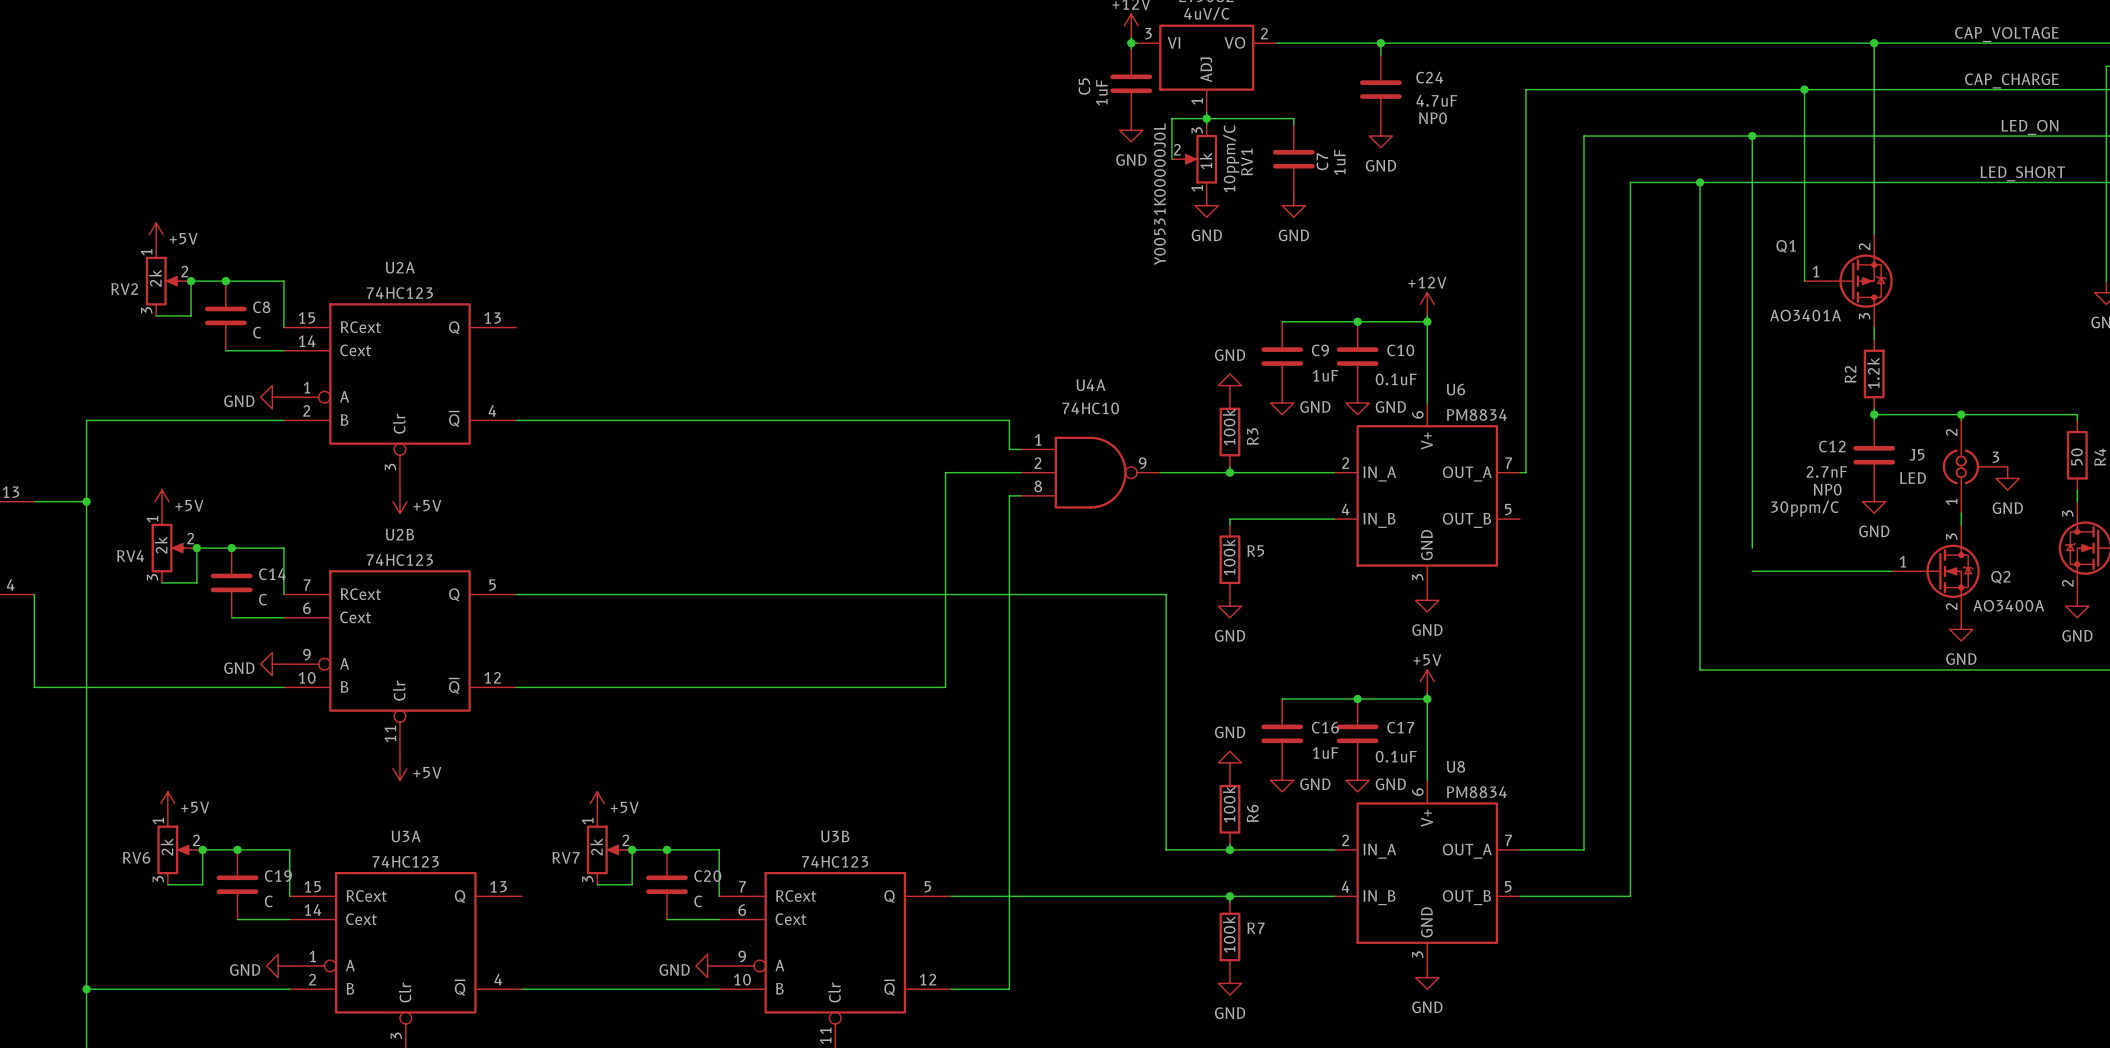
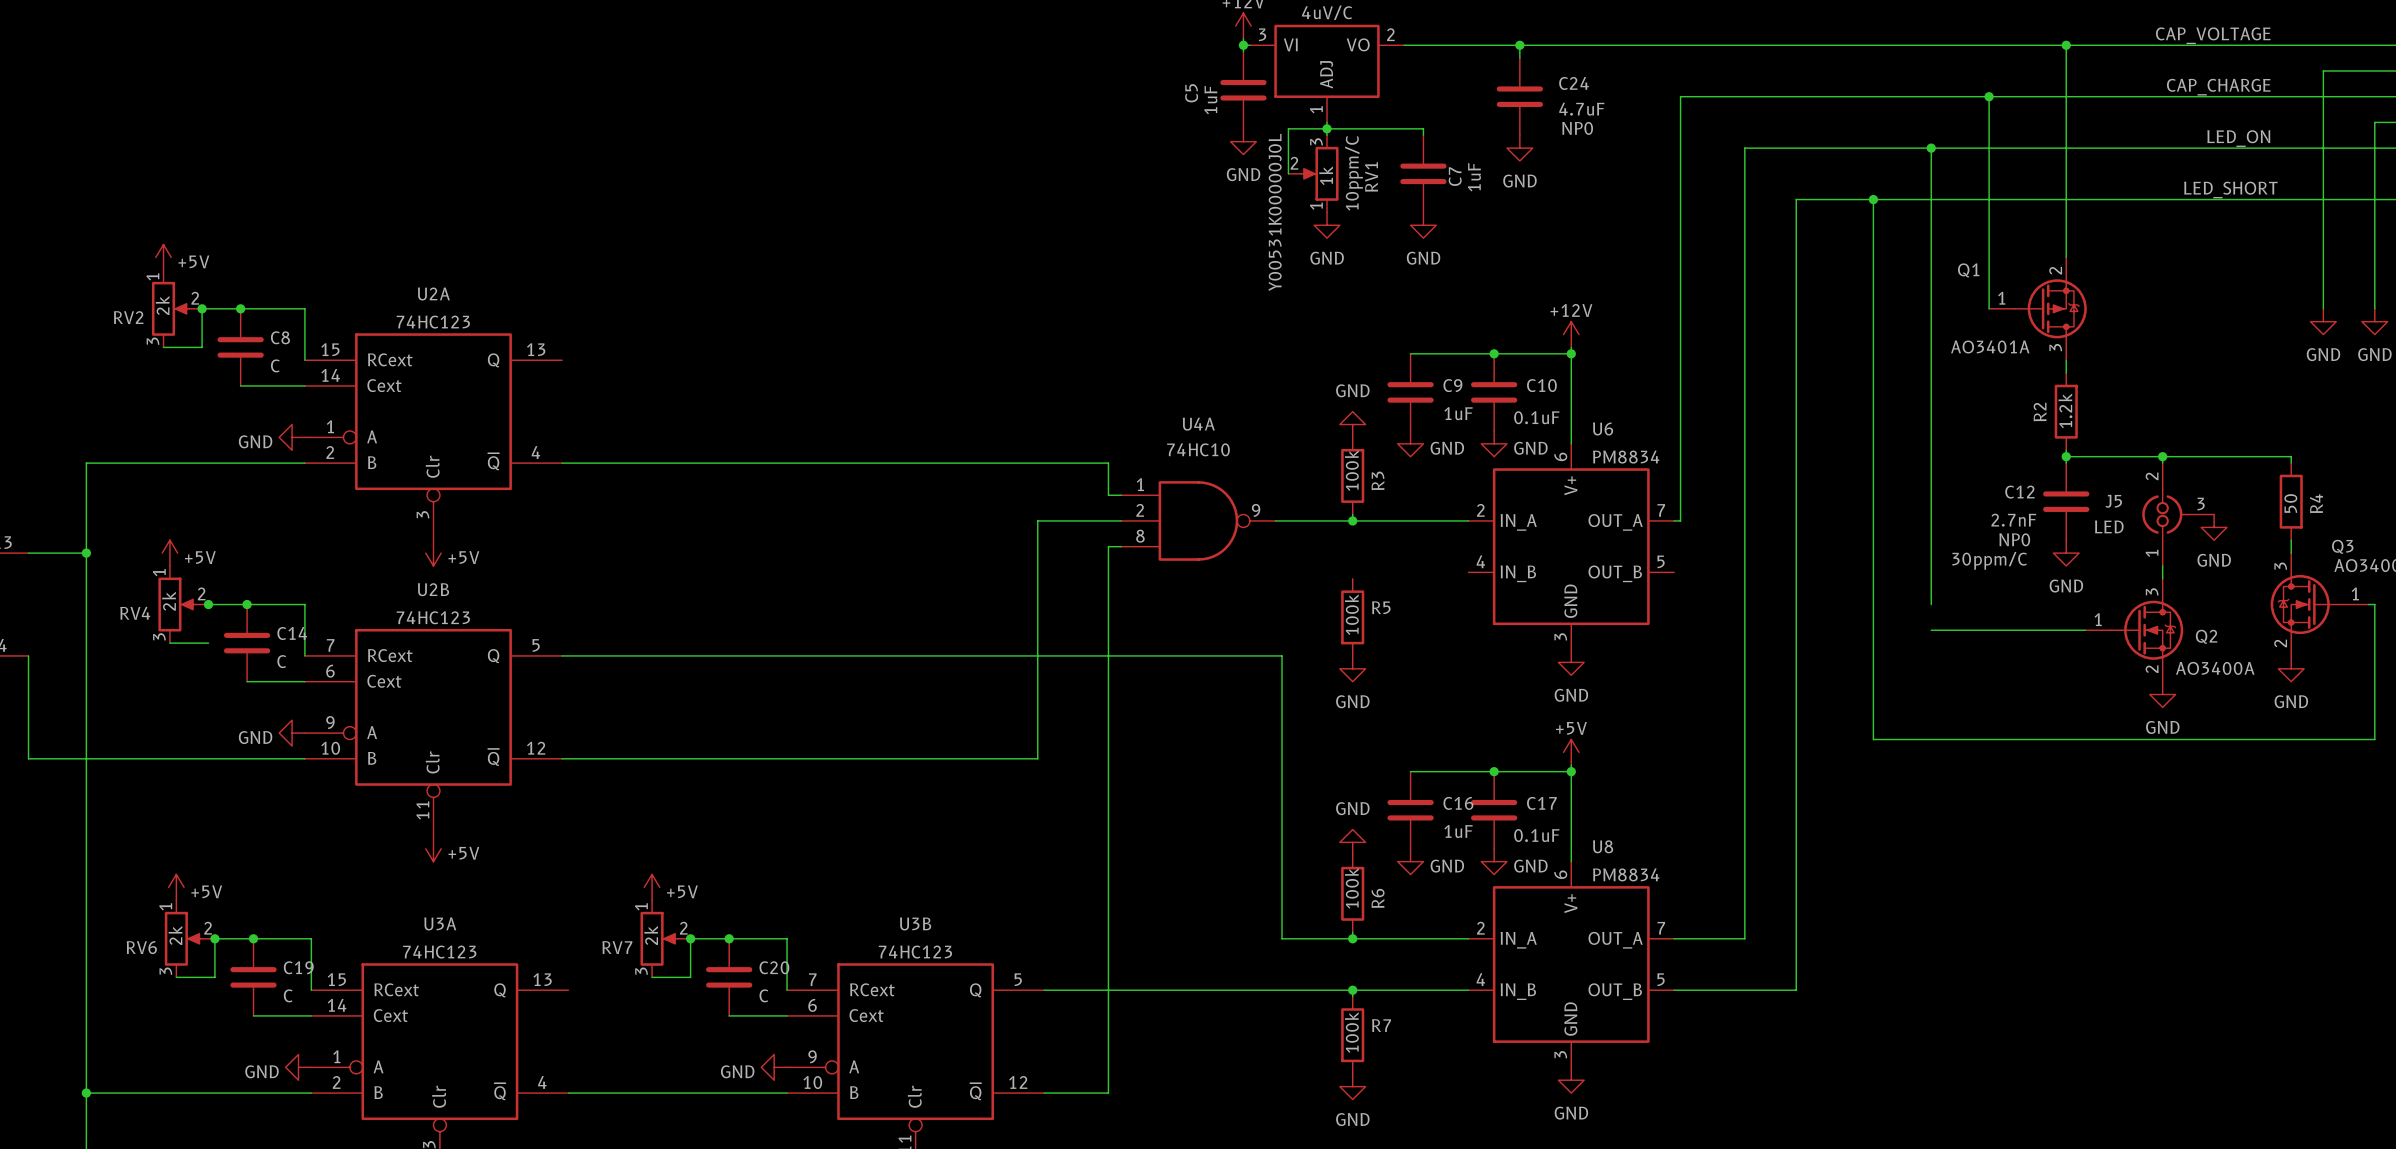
wire: (1334, 519) (1229, 519) (1229, 524) -> none
wire: (196, 548) (196, 582) -> none

